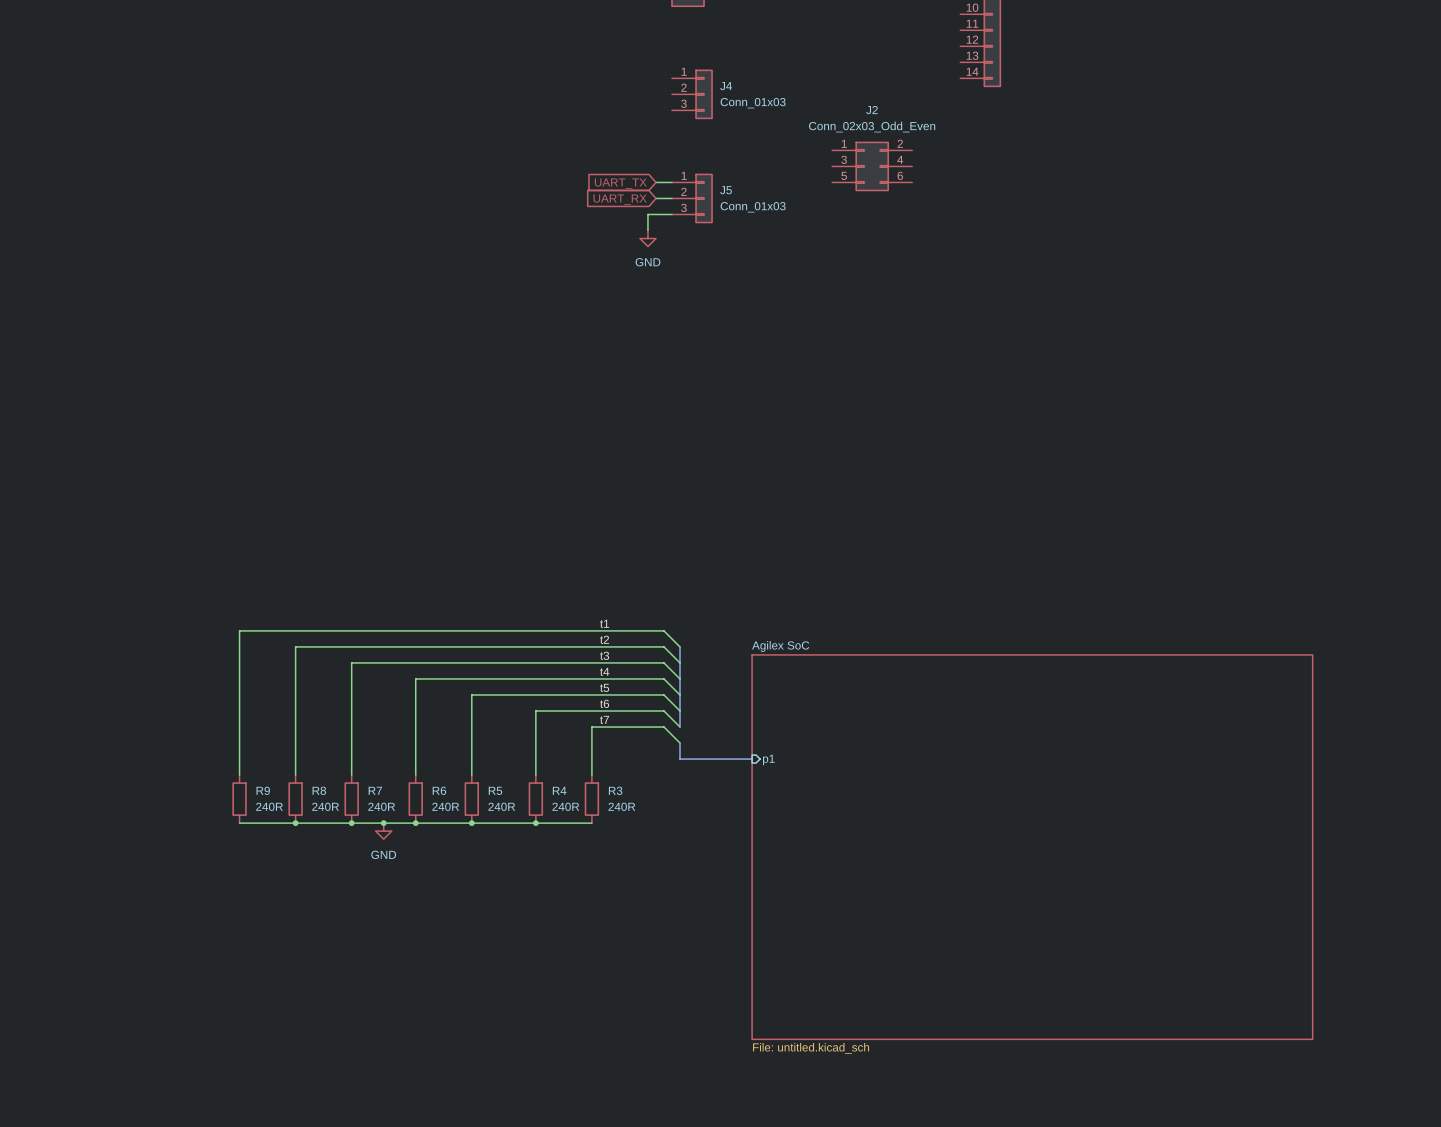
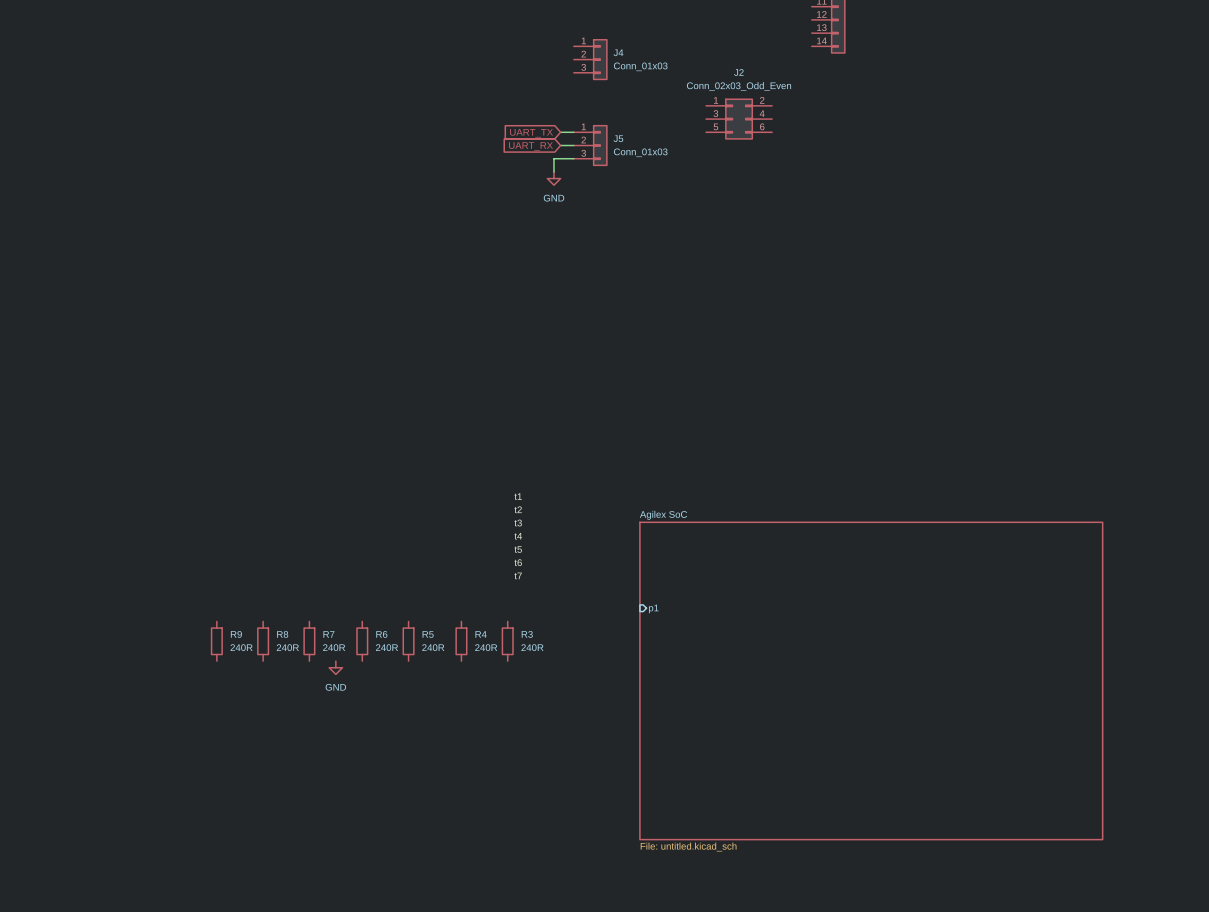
wire: (680, 646) (663, 630) (239, 630) (239, 775) -> none
bus: (680, 646) (680, 727) -> none
wire: (680, 662) (663, 646) (295, 646) (295, 775) -> none
wire: (680, 678) (663, 662) (351, 662) (351, 775) -> none
wire: (680, 694) (663, 678) (415, 678) (415, 775) -> none
wire: (680, 711) (663, 694) (471, 694) (471, 775) -> none
wire: (680, 727) (663, 711) (535, 711) (535, 775) -> none
wire: (680, 743) (663, 727) (591, 727) (591, 775) -> none
bus: (680, 743) (680, 759) (752, 759) -> none
wire: (239, 823) (591, 823) -> none
junction: (295, 823) -> none
junction: (351, 823) -> none
junction: (383, 823) -> none
junction: (415, 823) -> none
junction: (471, 823) -> none
junction: (535, 823) -> none

